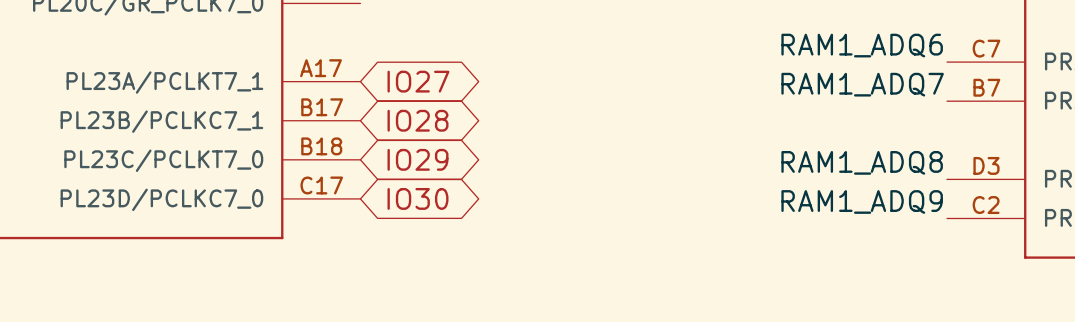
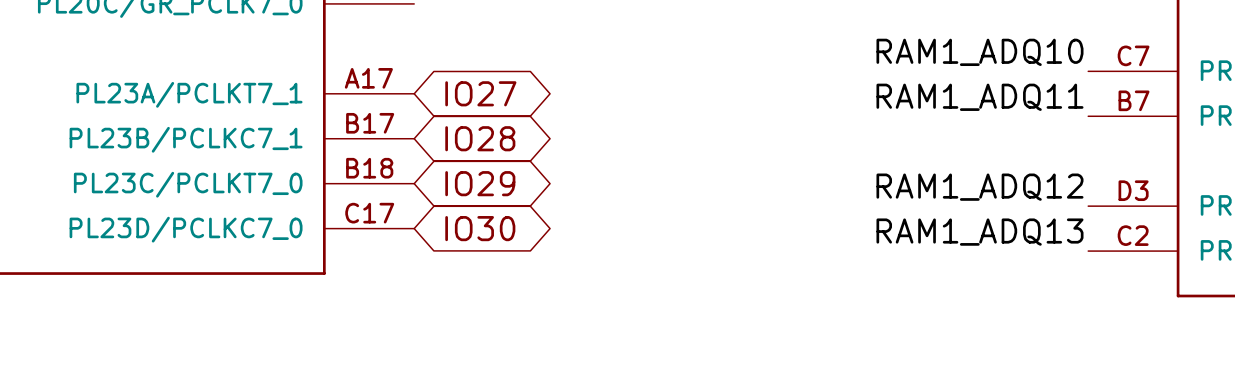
label: RAM1_ADQ6 (862, 45) -> RAM1_ADQ10 (979, 52)
label: RAM1_ADQ7 (862, 84) -> RAM1_ADQ11 (979, 97)
label: RAM1_ADQ8 (862, 162) -> RAM1_ADQ12 (979, 187)
label: RAM1_ADQ9 (862, 201) -> RAM1_ADQ13 (979, 232)

